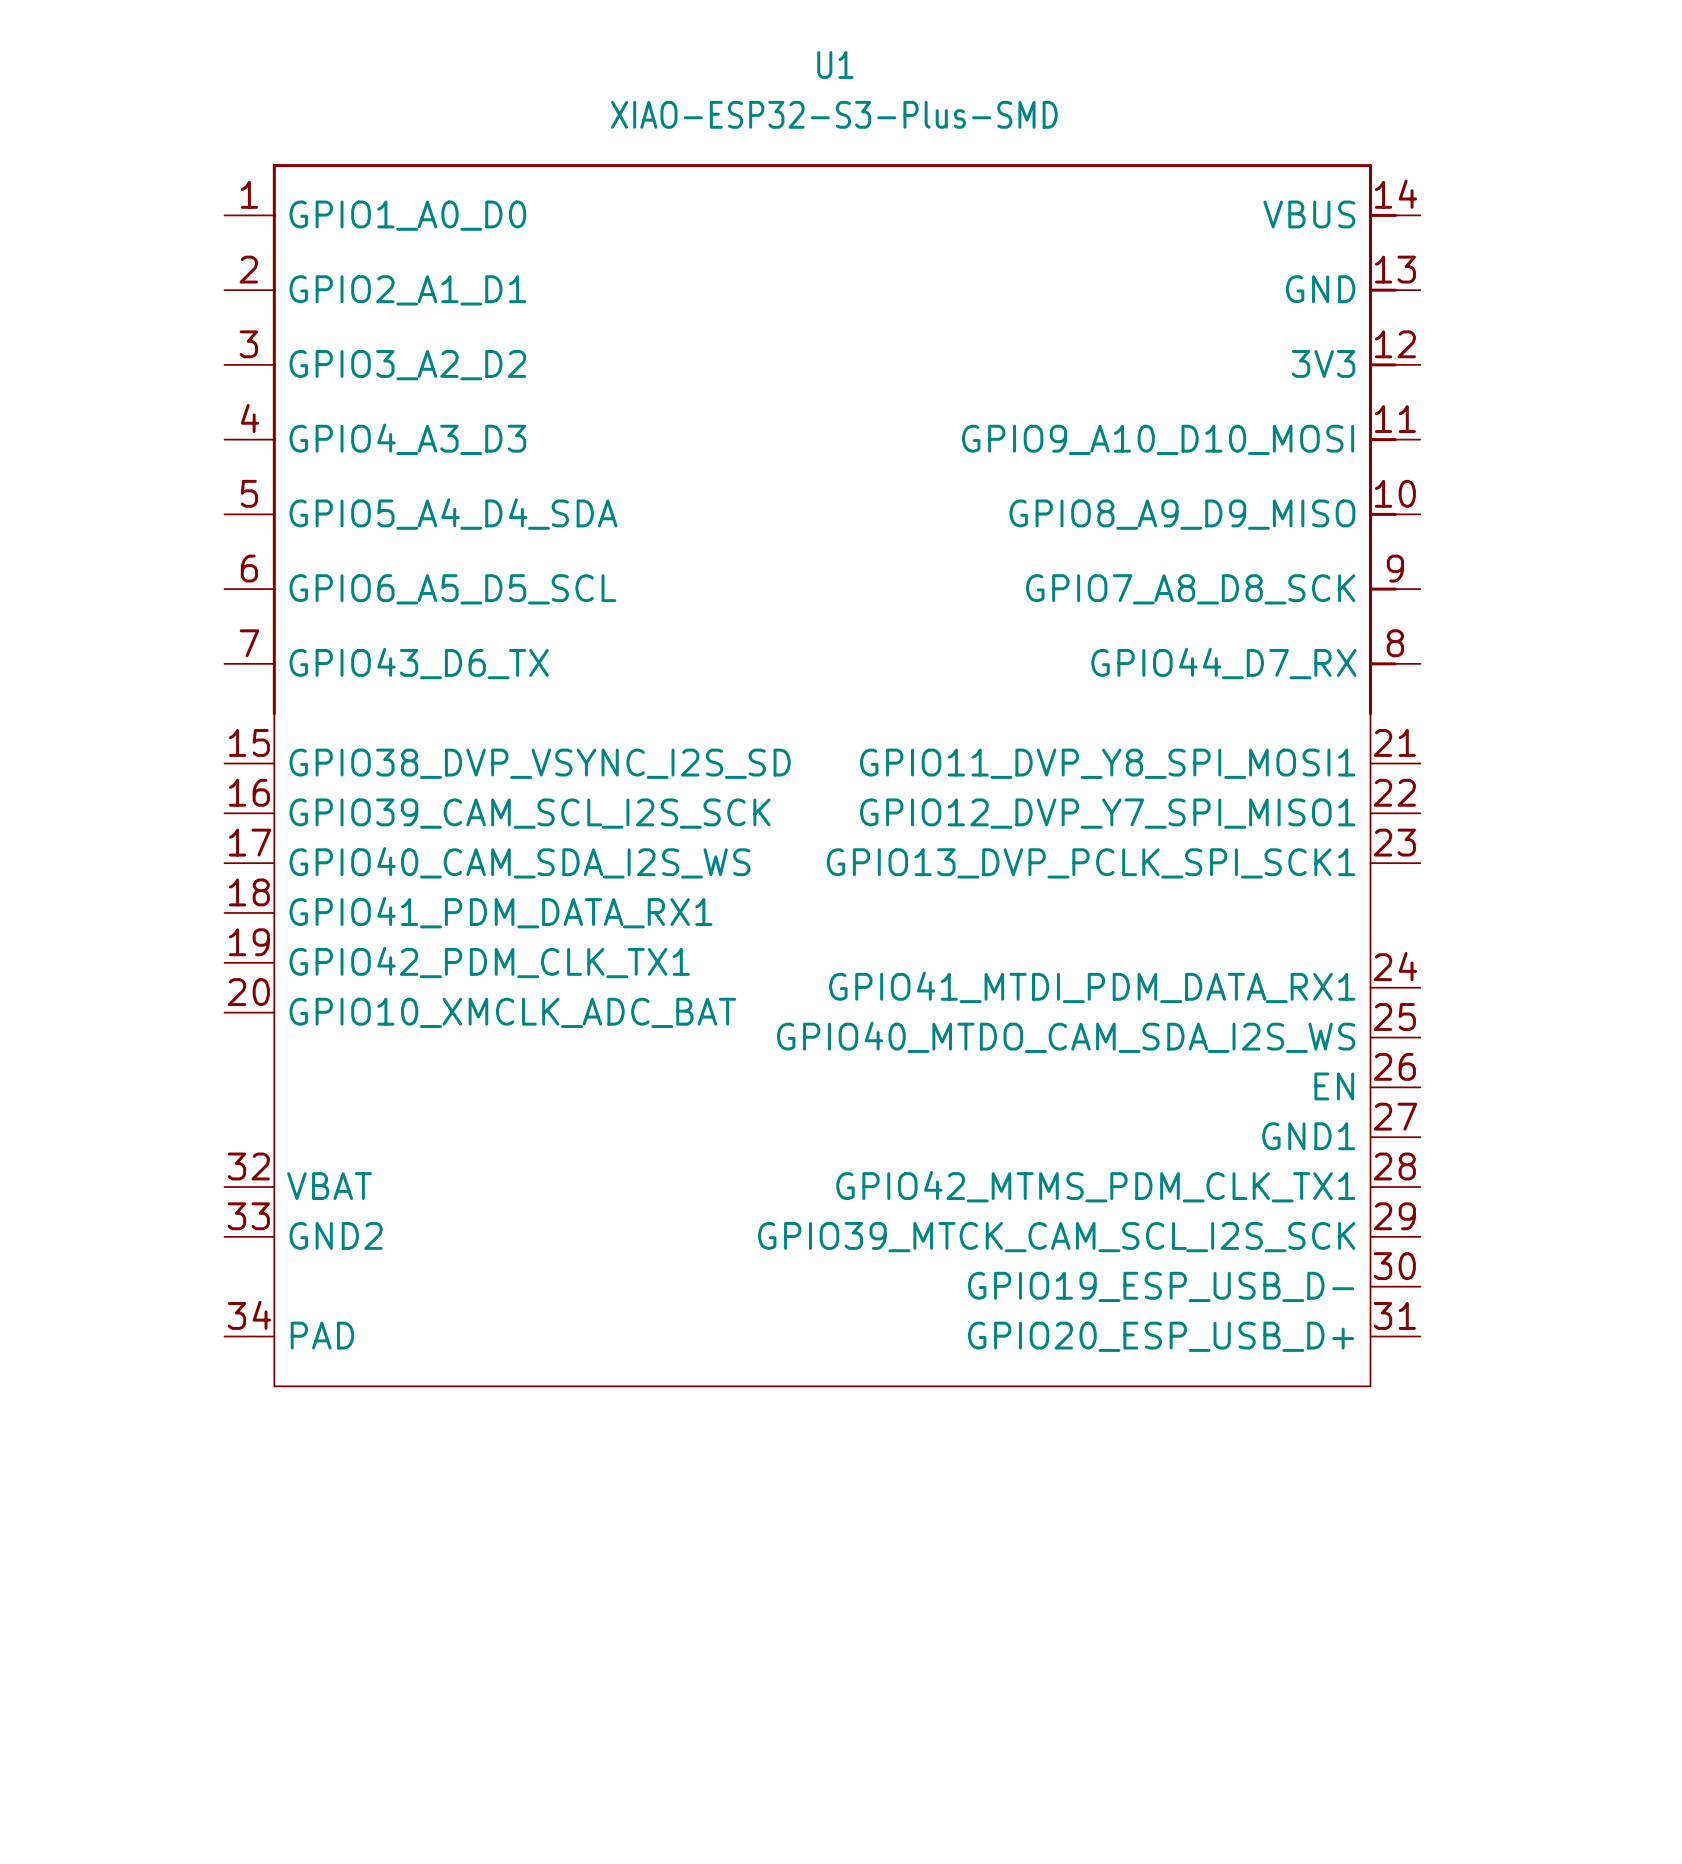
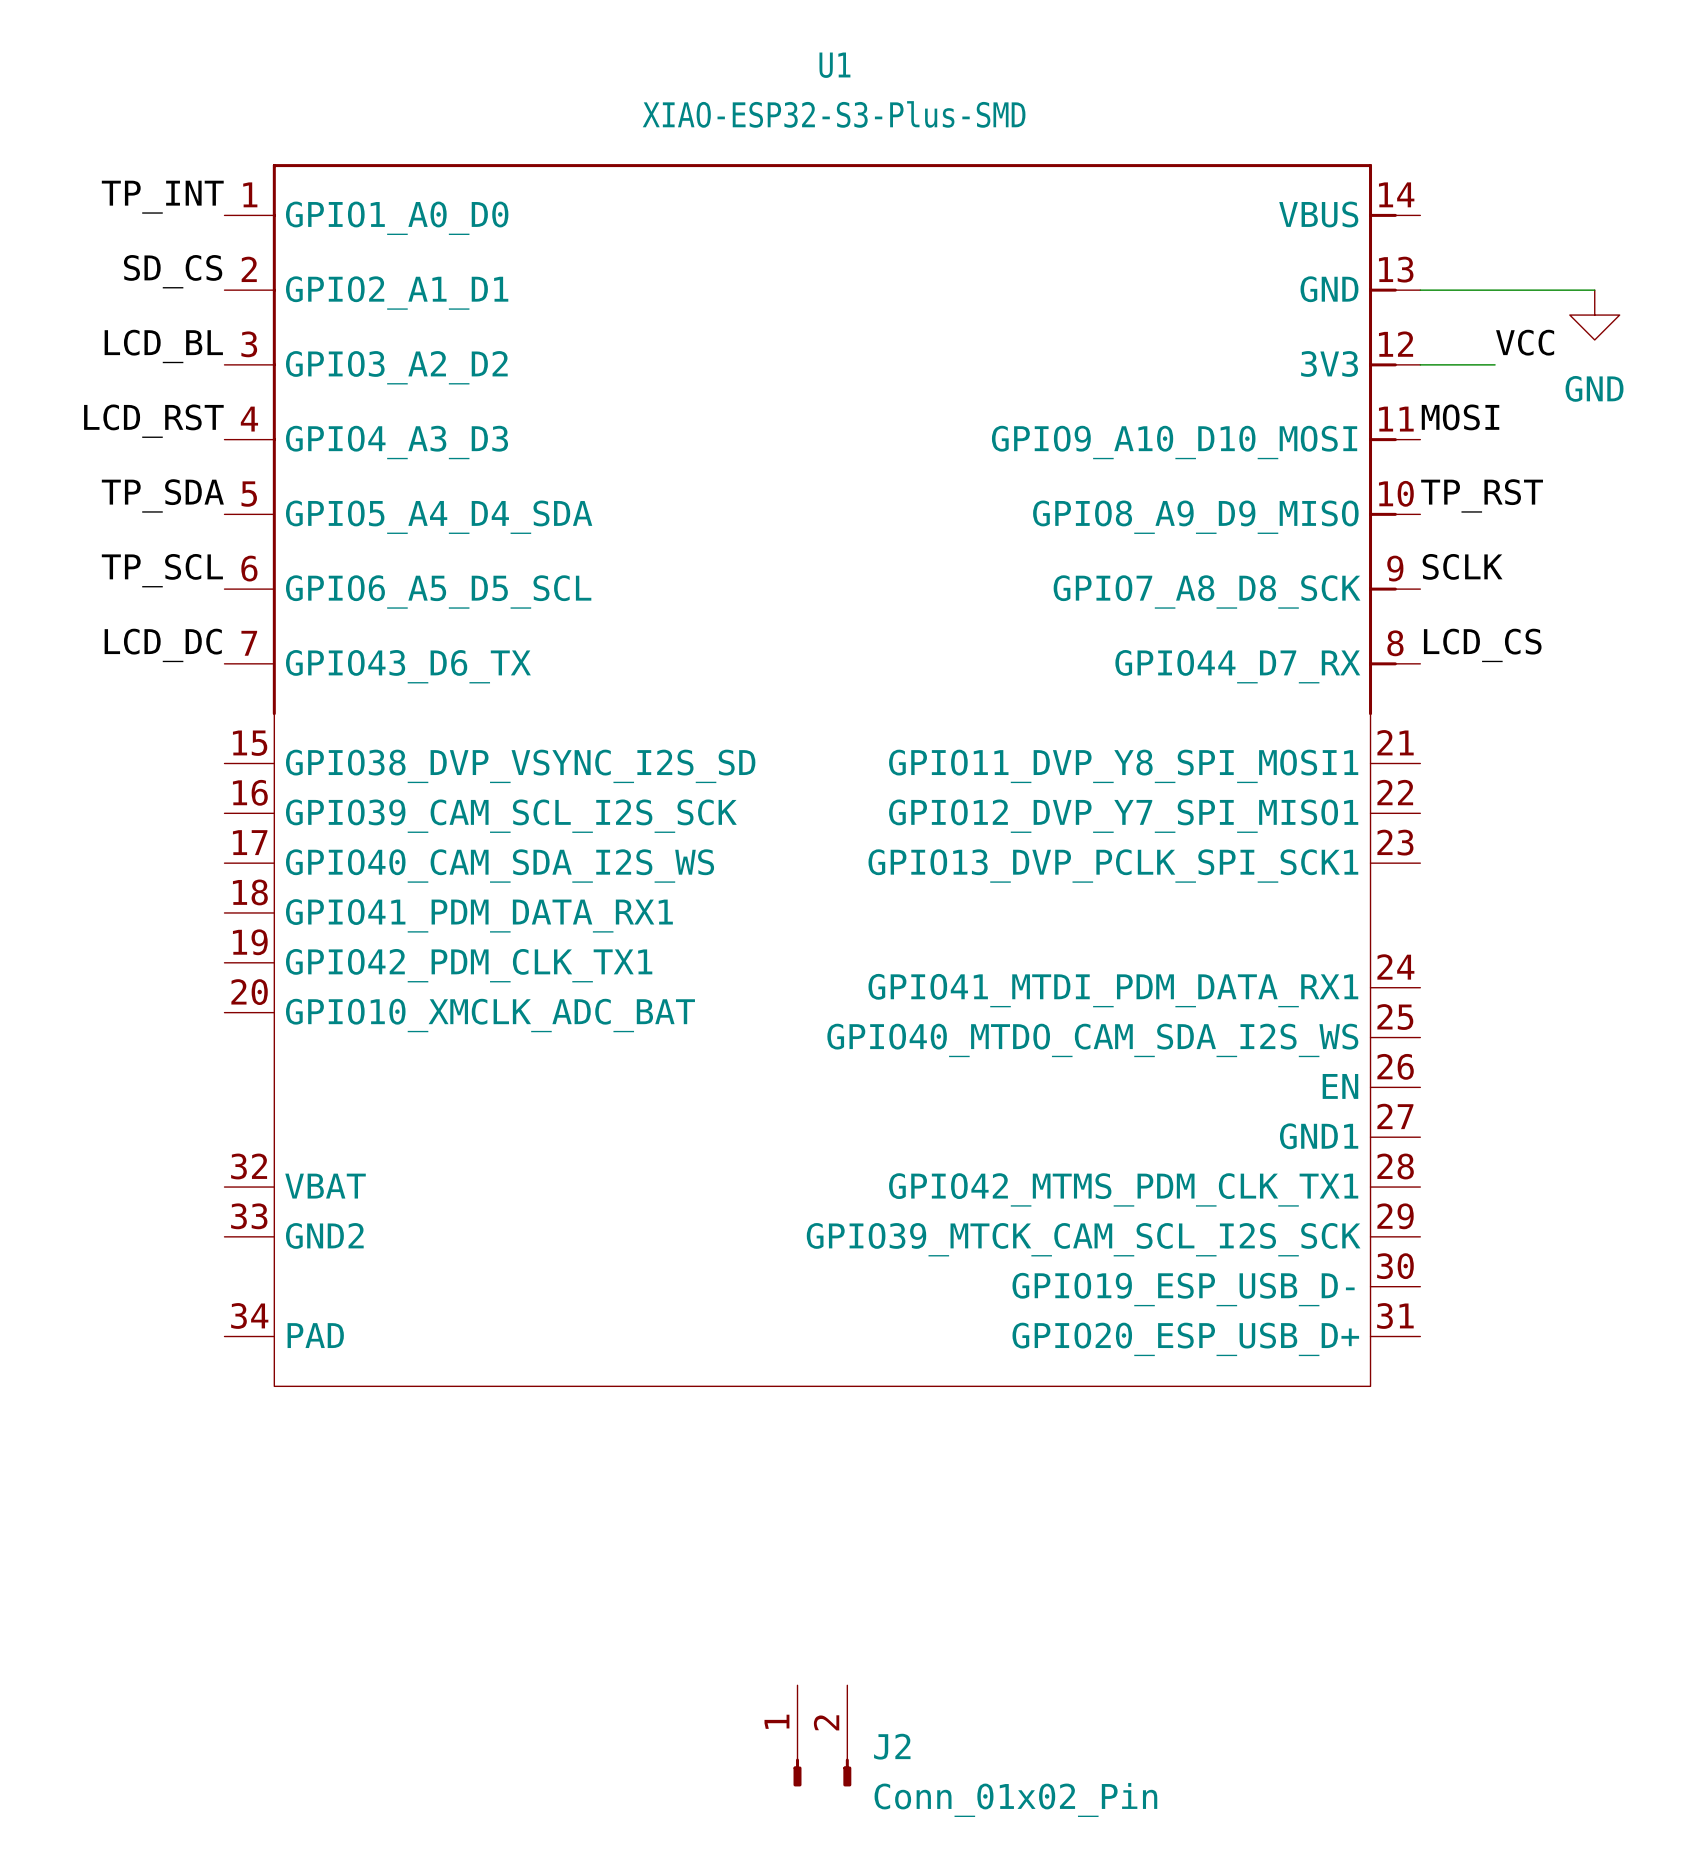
label: none -> TP_INT (162, 197)
label: none -> SD_CS (173, 271)
wire: none -> (1420, 290) (1594, 290)
power symbol: none -> GND (1594, 315)
label: none -> VCC (1525, 342)
label: none -> LCD_BL (163, 346)
wire: none -> (1420, 364) (1495, 364)
label: none -> MOSI (1460, 417)
label: none -> LCD_RST (153, 421)
label: none -> TP_SDA (162, 495)
label: none -> TP_RST (1482, 495)
label: none -> SCLK (1462, 566)
label: none -> TP_SCL (162, 570)
label: none -> LCD_DC (163, 645)
label: none -> LCD_CS (1482, 645)
J2: none -> Conn_01x02_Pin (822, 1735)

